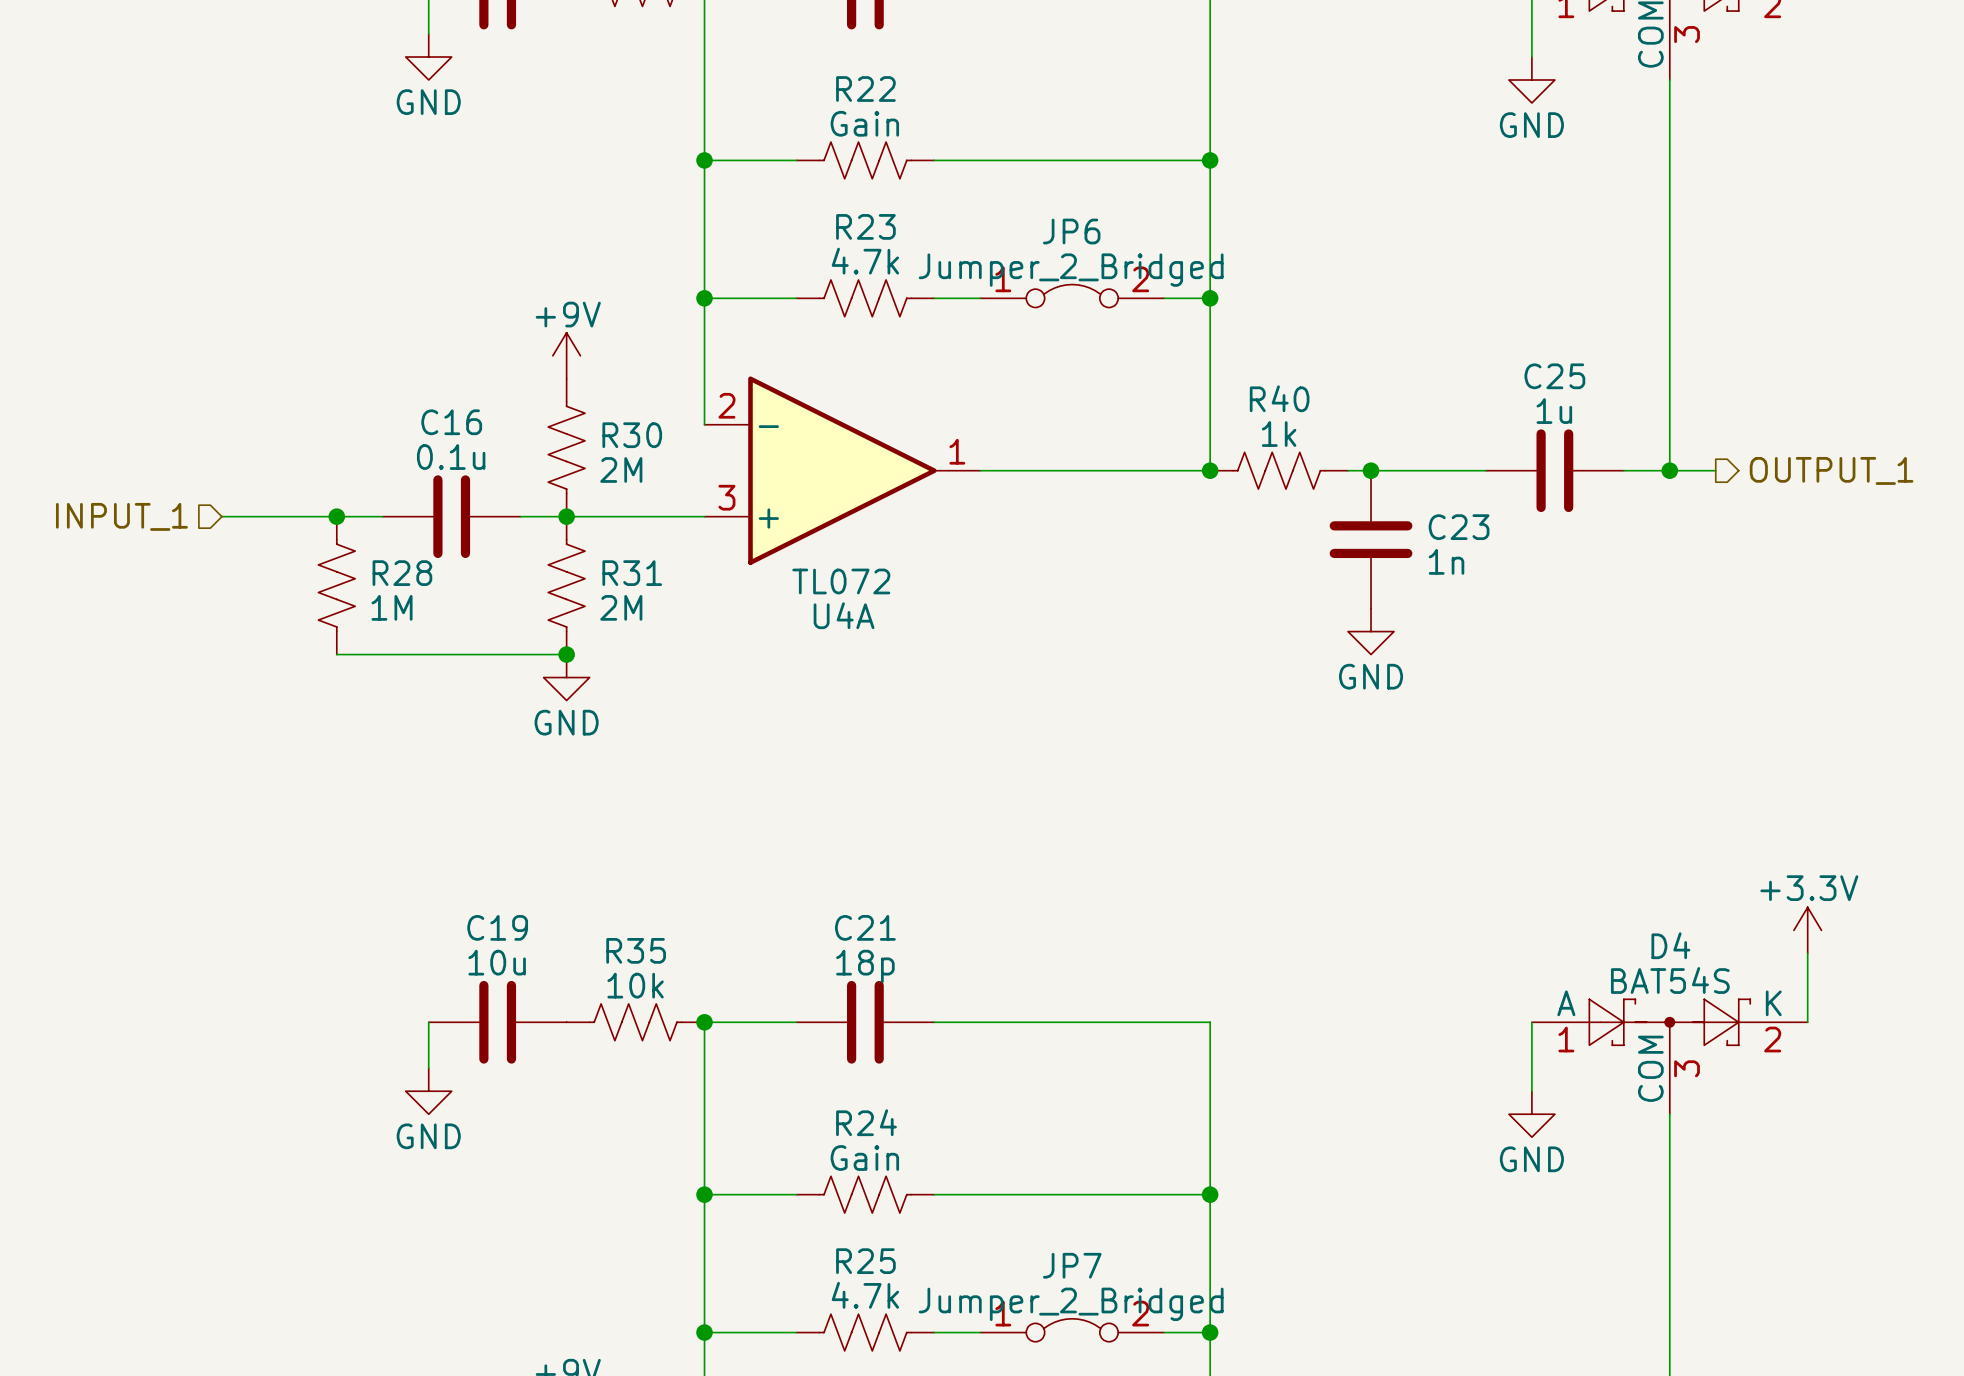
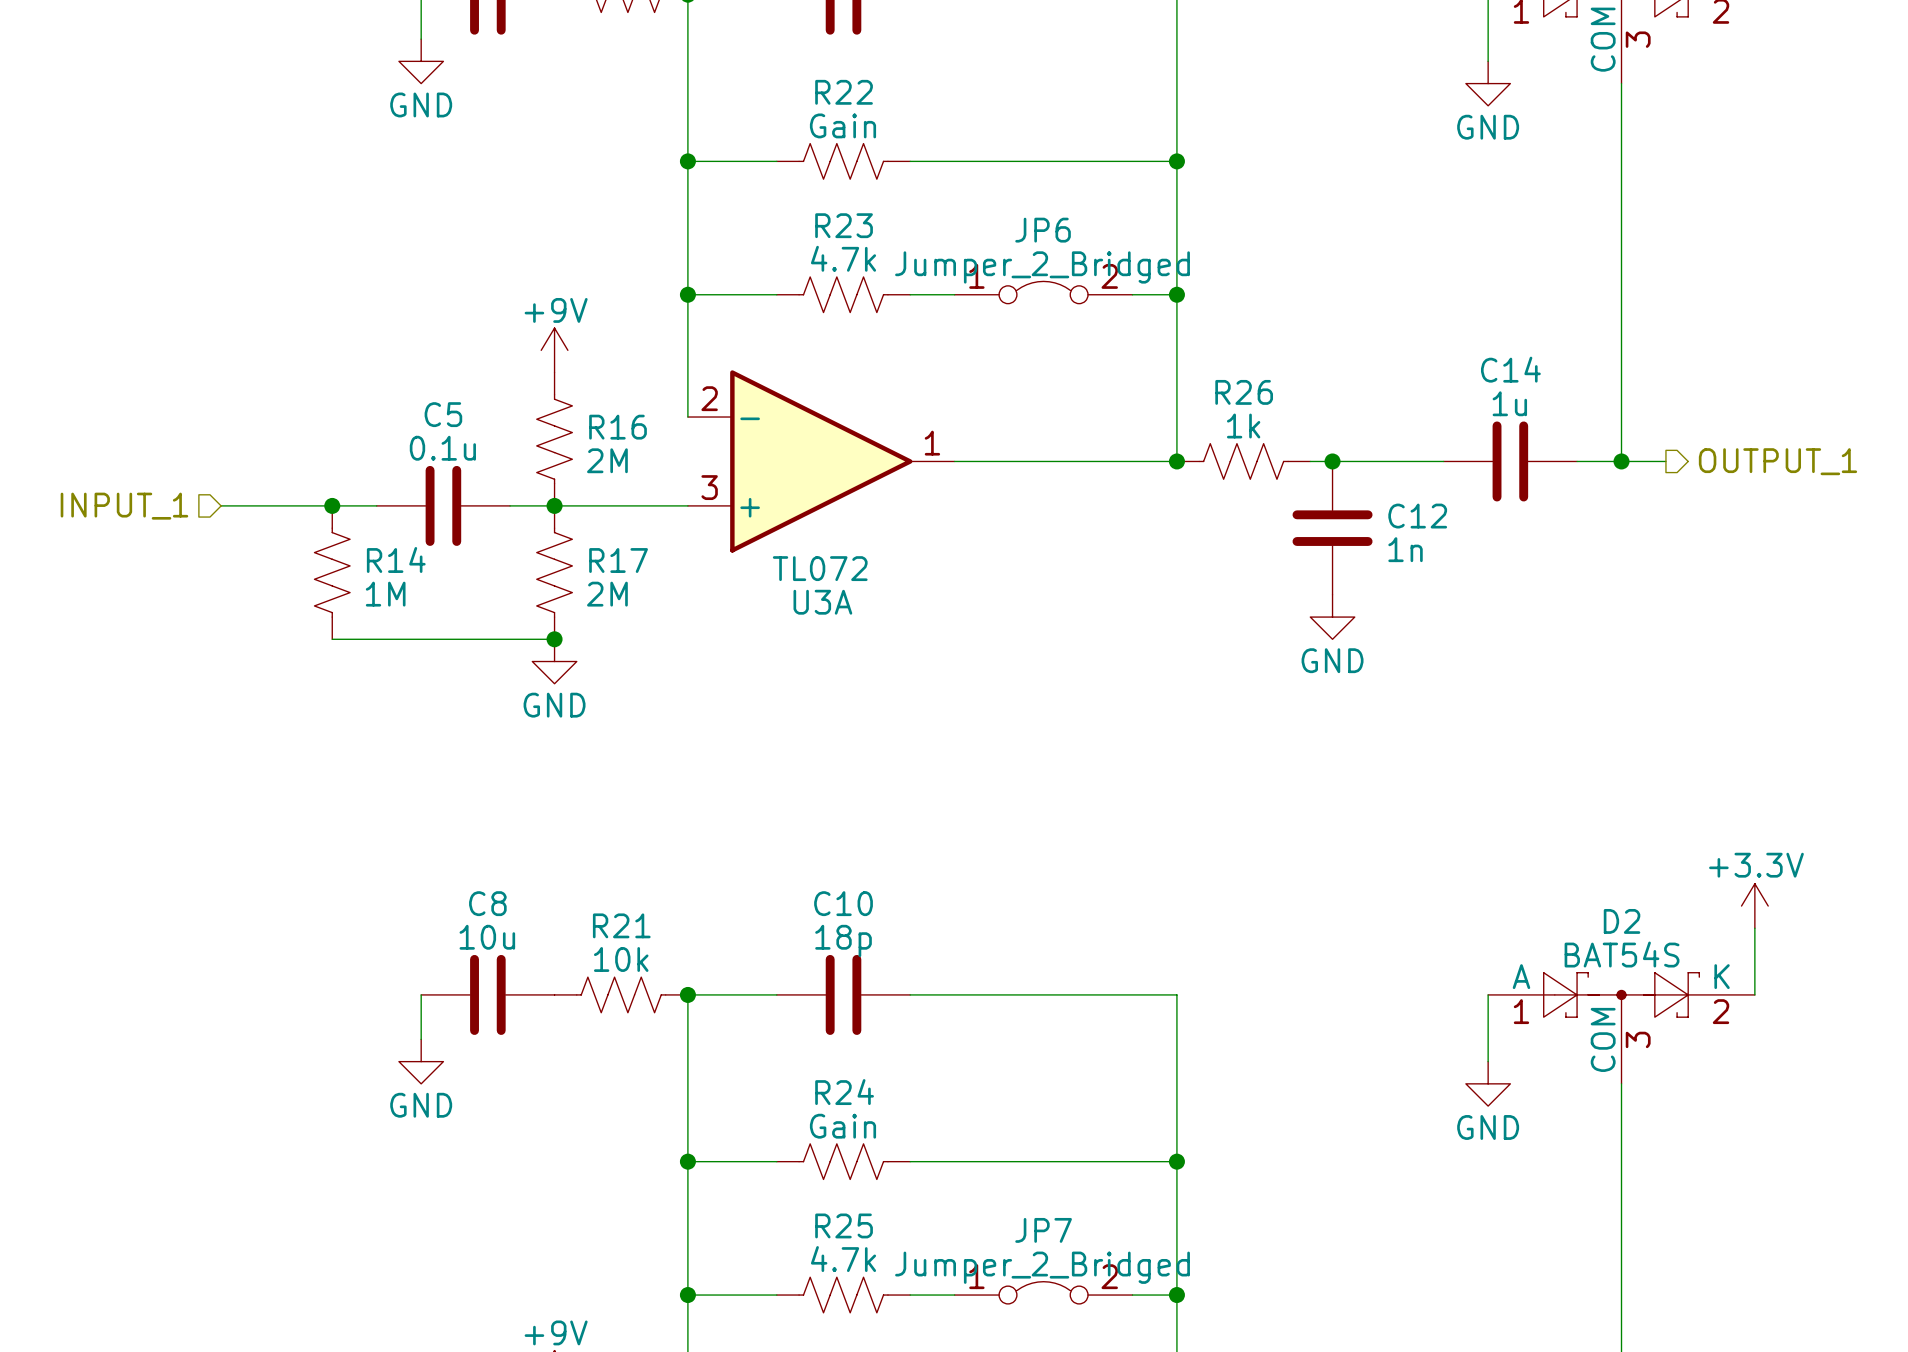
C25 name: C25 (1554, 376) -> C14 (1510, 369)
R40 name: R40 (1279, 398) -> R26 (1244, 392)
C16 name: C16 (451, 422) -> C5 (443, 414)
R30 name: R30 (632, 435) -> R16 (618, 427)
C23 name: C23 (1459, 527) -> C12 (1417, 516)
R28 name: R28 (402, 573) -> R14 (396, 559)
R31 name: R31 (632, 573) -> R17 (618, 560)
U4A name: U4A (844, 615) -> U3A (822, 602)
C19 name: C19 (497, 927) -> C8 (487, 903)
C21 name: C21 (865, 927) -> C10 (843, 903)
D4 name: D4 (1670, 945) -> D2 (1622, 921)
R35 name: R35 (636, 950) -> R21 (621, 925)

